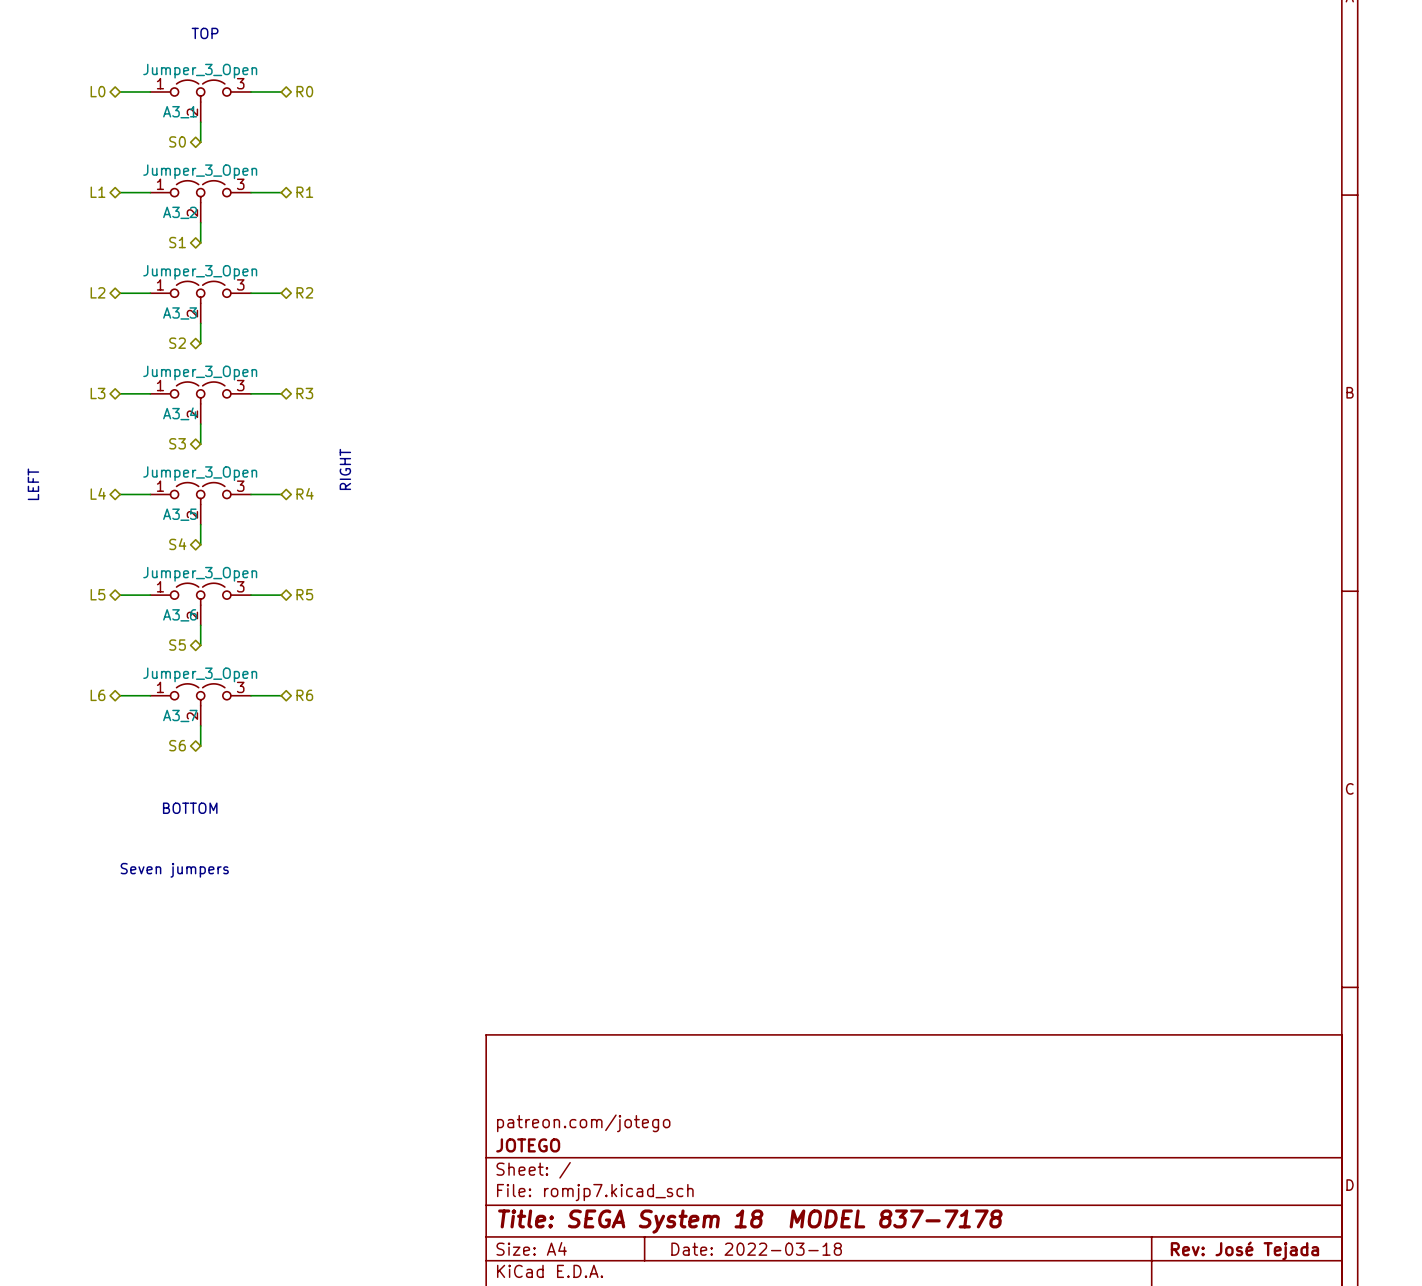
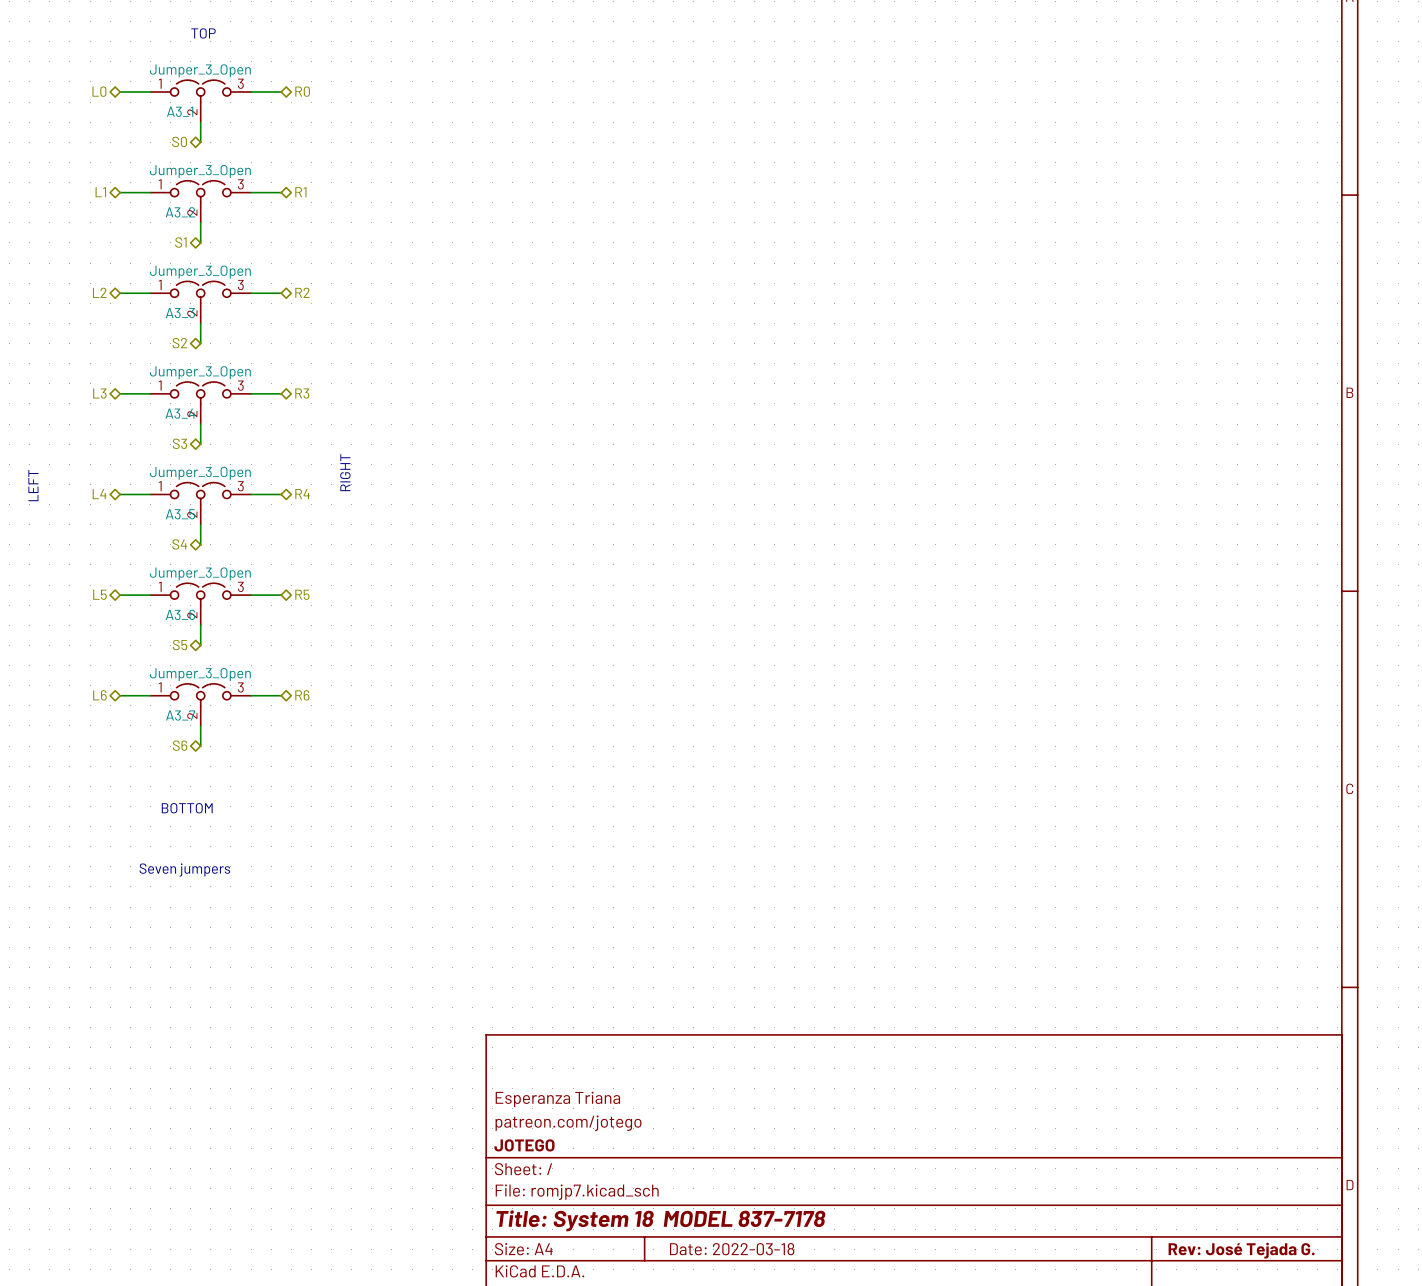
title block: none -> Esperanza Triana (557, 1099)
title block: Title: SEGA System 18 MODEL 837-7178 (750, 1221) -> Title: System 18 MODEL 837-7178 (660, 1220)
title block: Rev: José Tejada (1244, 1250) -> Rev: José Tejada G. (1241, 1250)

